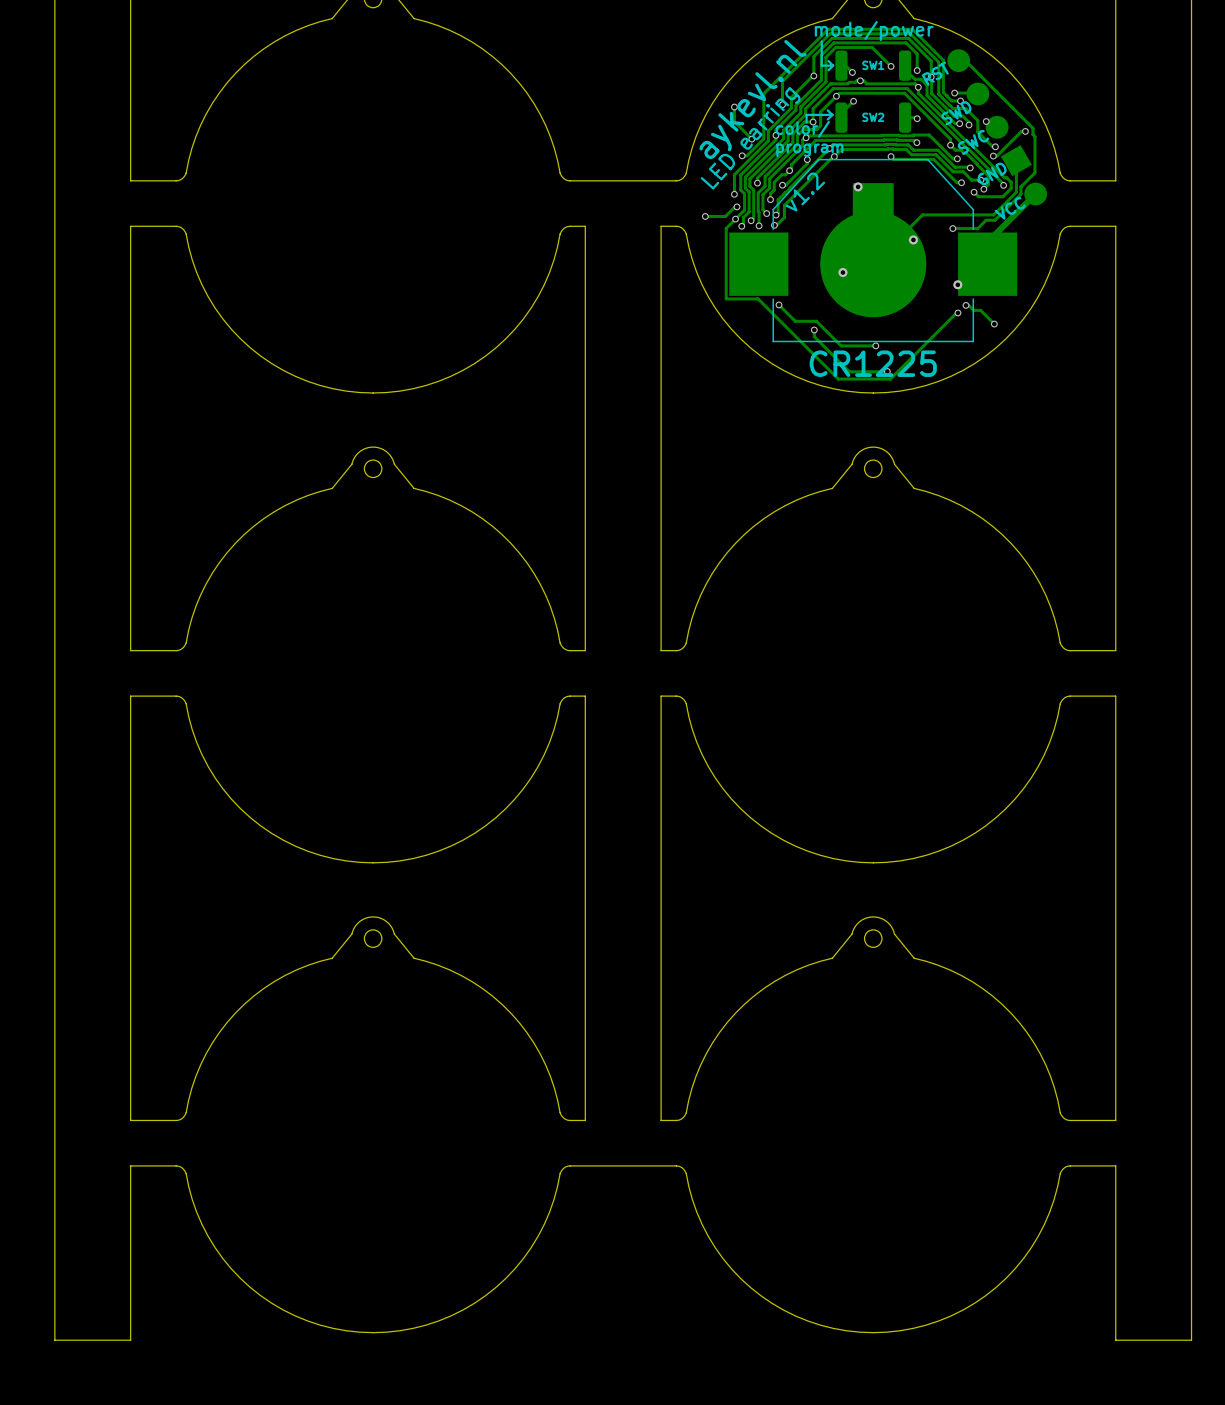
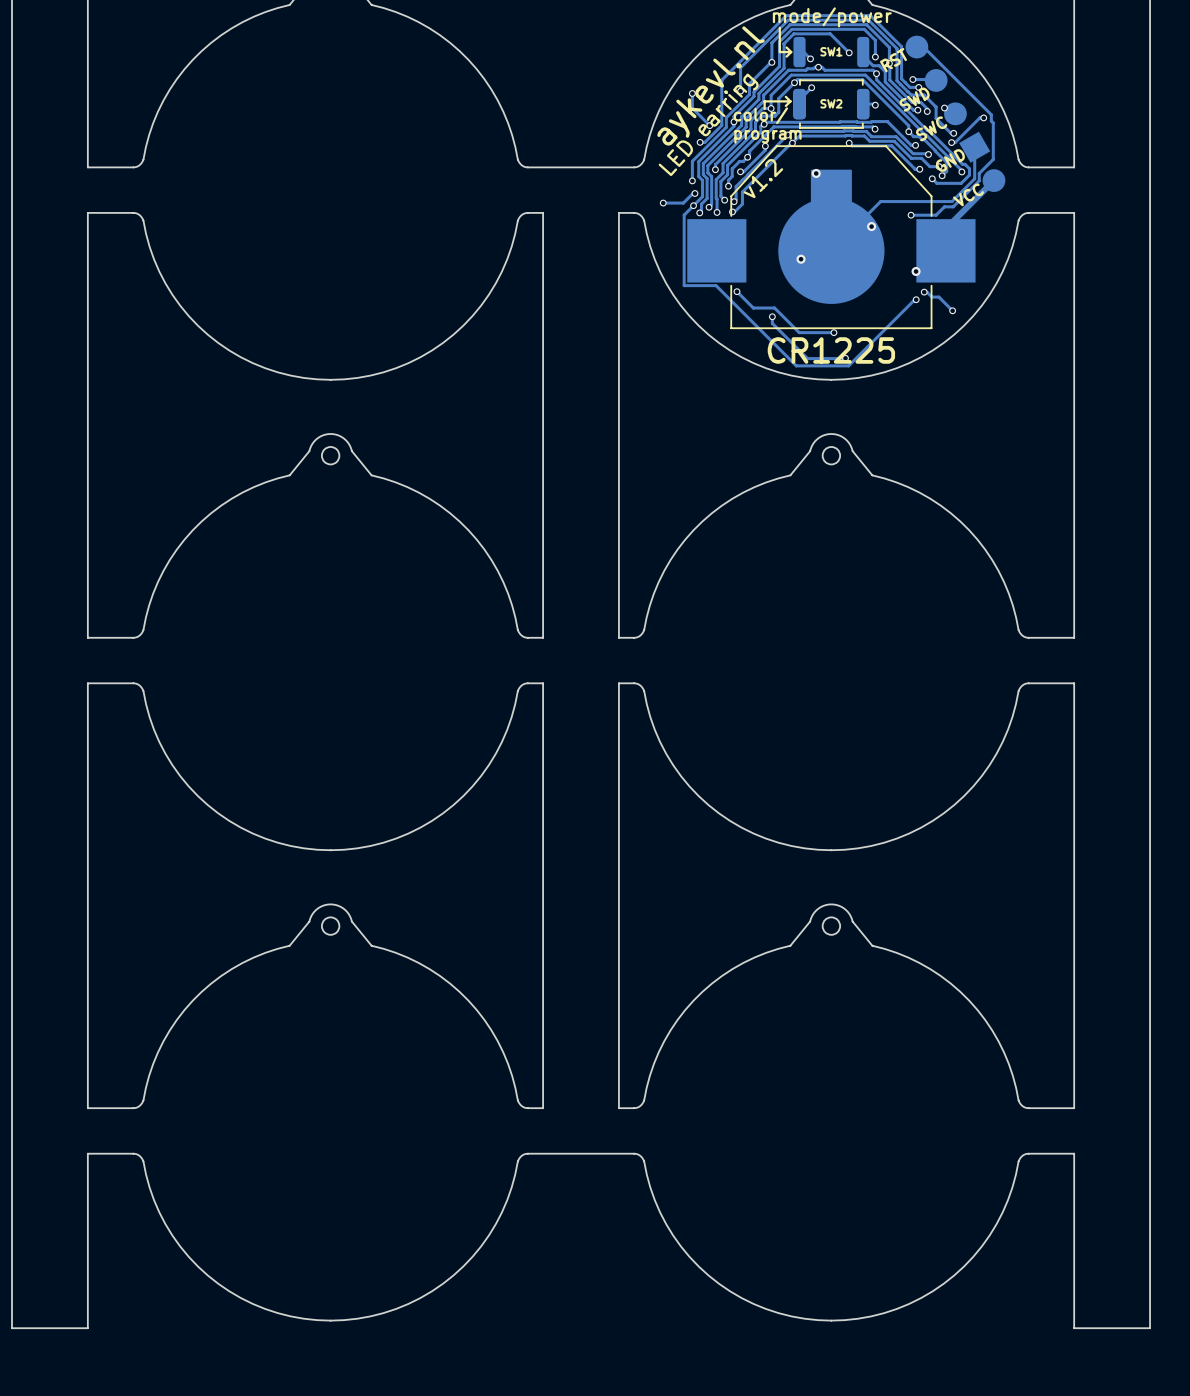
part: none -> (831, 104)

